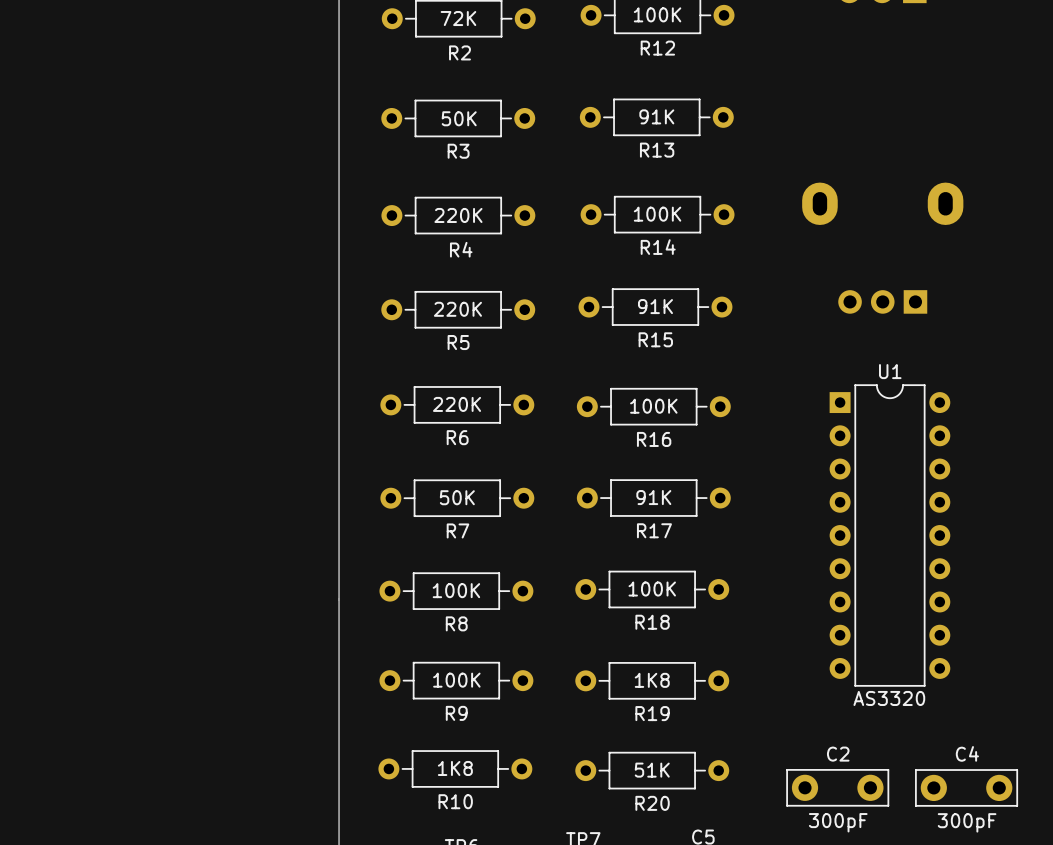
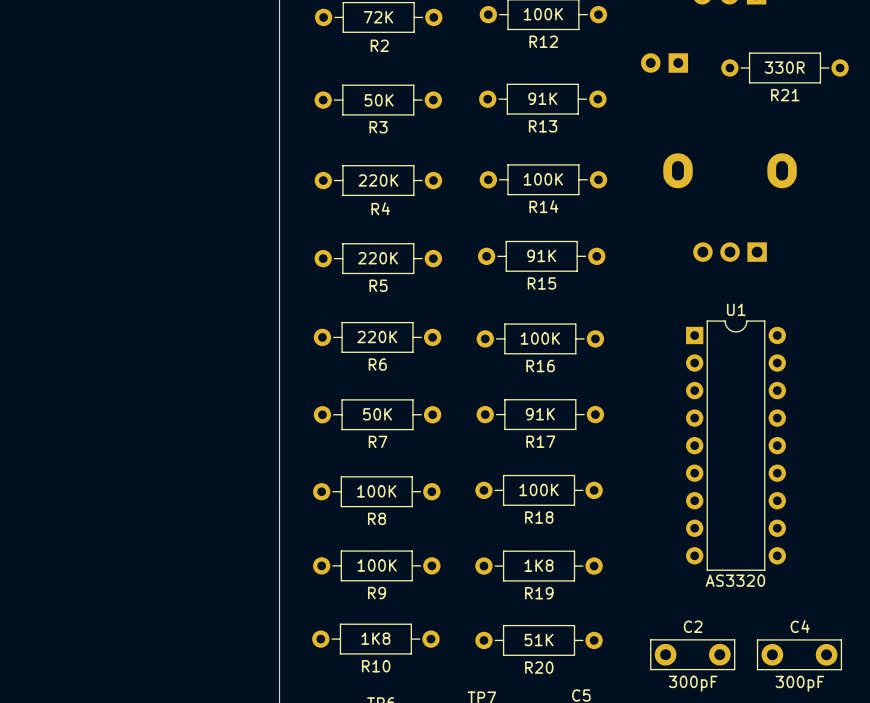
part: none -> (664, 63)
R21: none -> 330R (785, 67)

